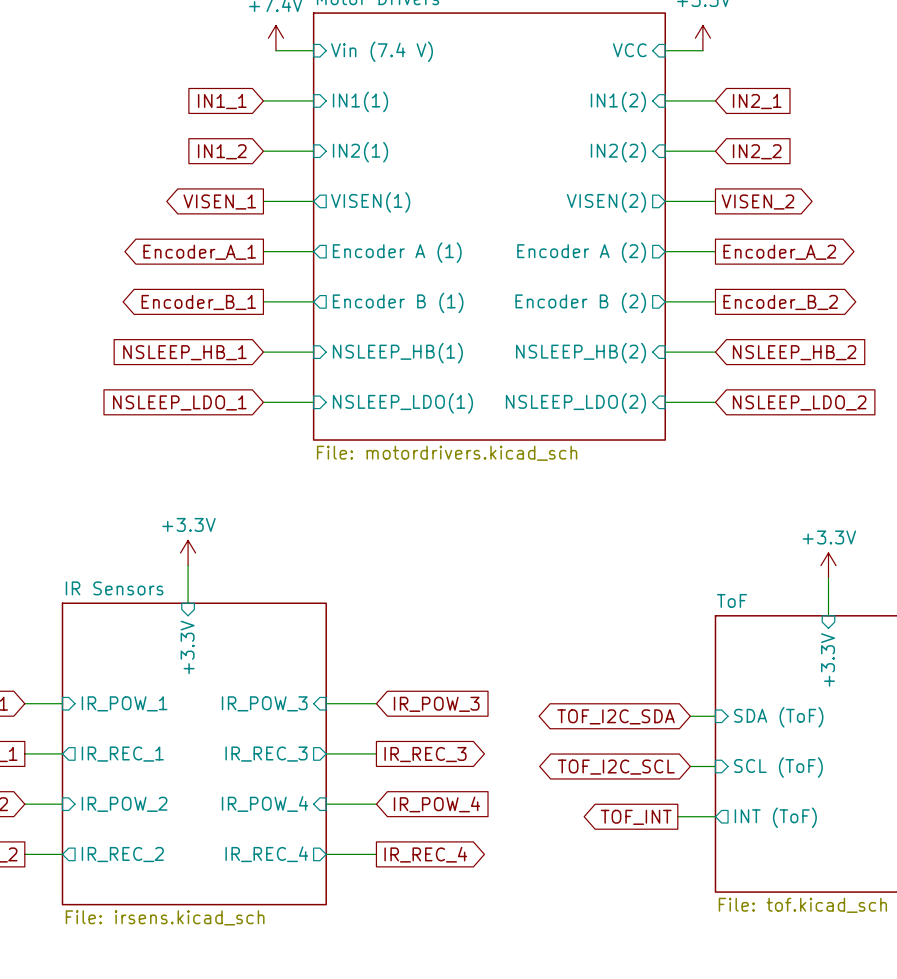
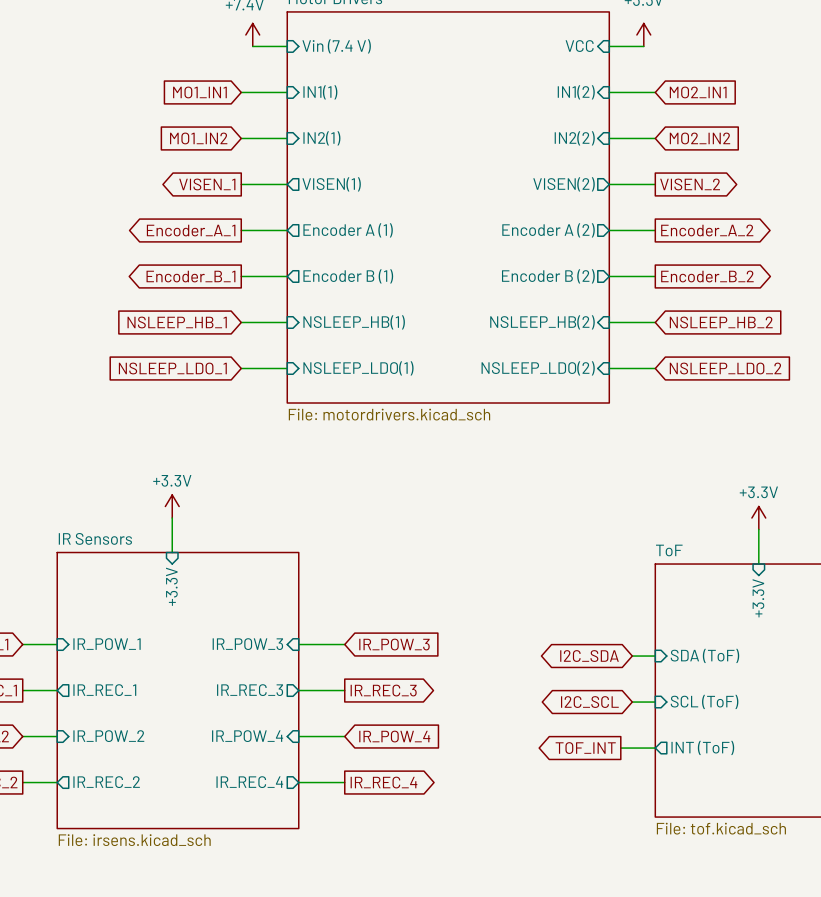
global label: IN1_1 (222, 101) -> MO1_IN1 (199, 92)
global label: IN2_1 (757, 101) -> MO2_IN1 (698, 92)
global label: IN1_2 (222, 151) -> MO1_IN2 (198, 138)
global label: IN2_2 (757, 151) -> MO2_IN2 (699, 138)
global label: TOF_I2C_SDA (616, 716) -> I2C_SDA (589, 656)
global label: TOF_I2C_SCL (616, 767) -> I2C_SCL (589, 702)

